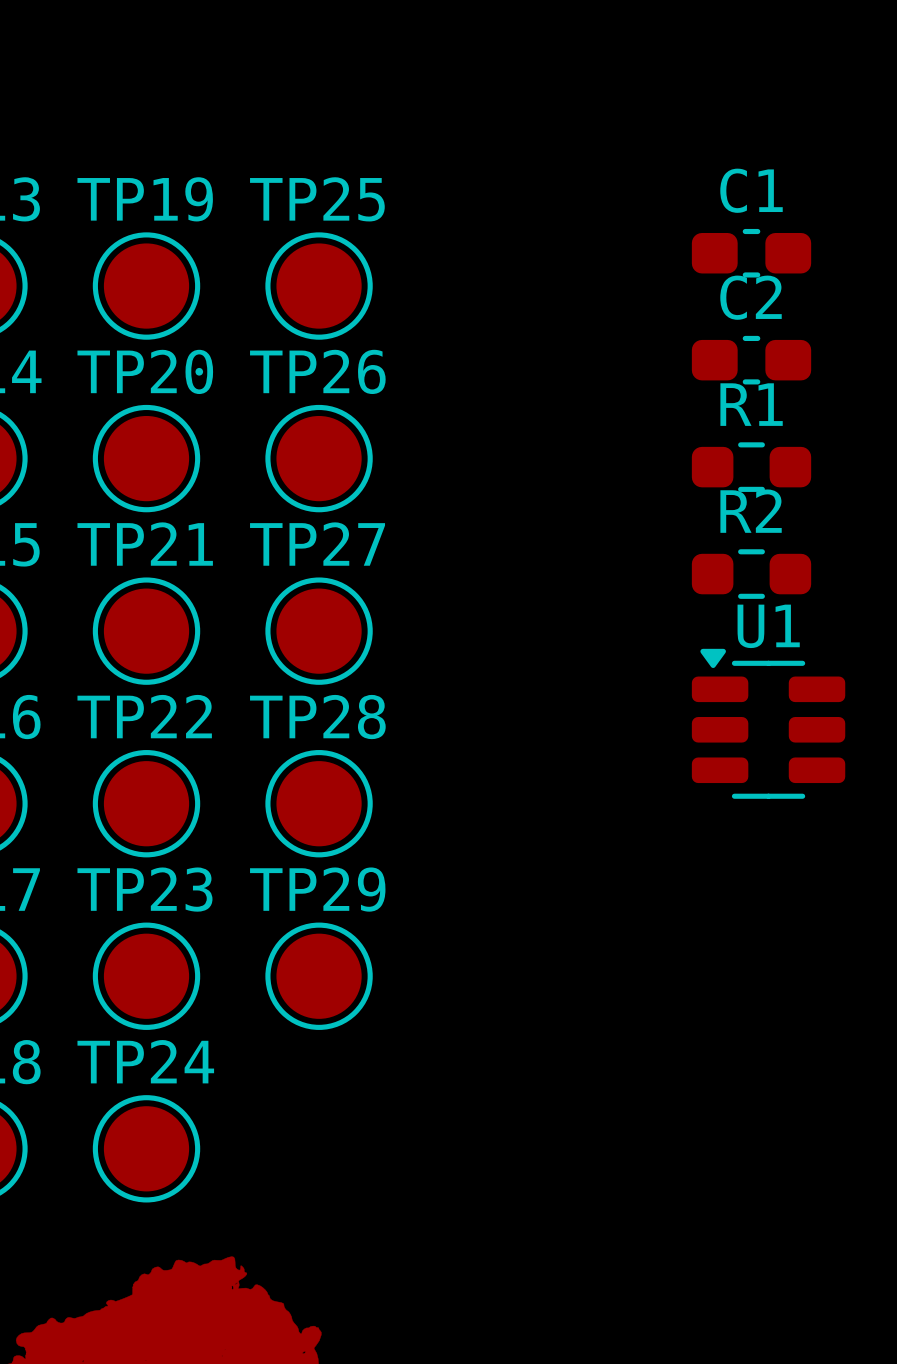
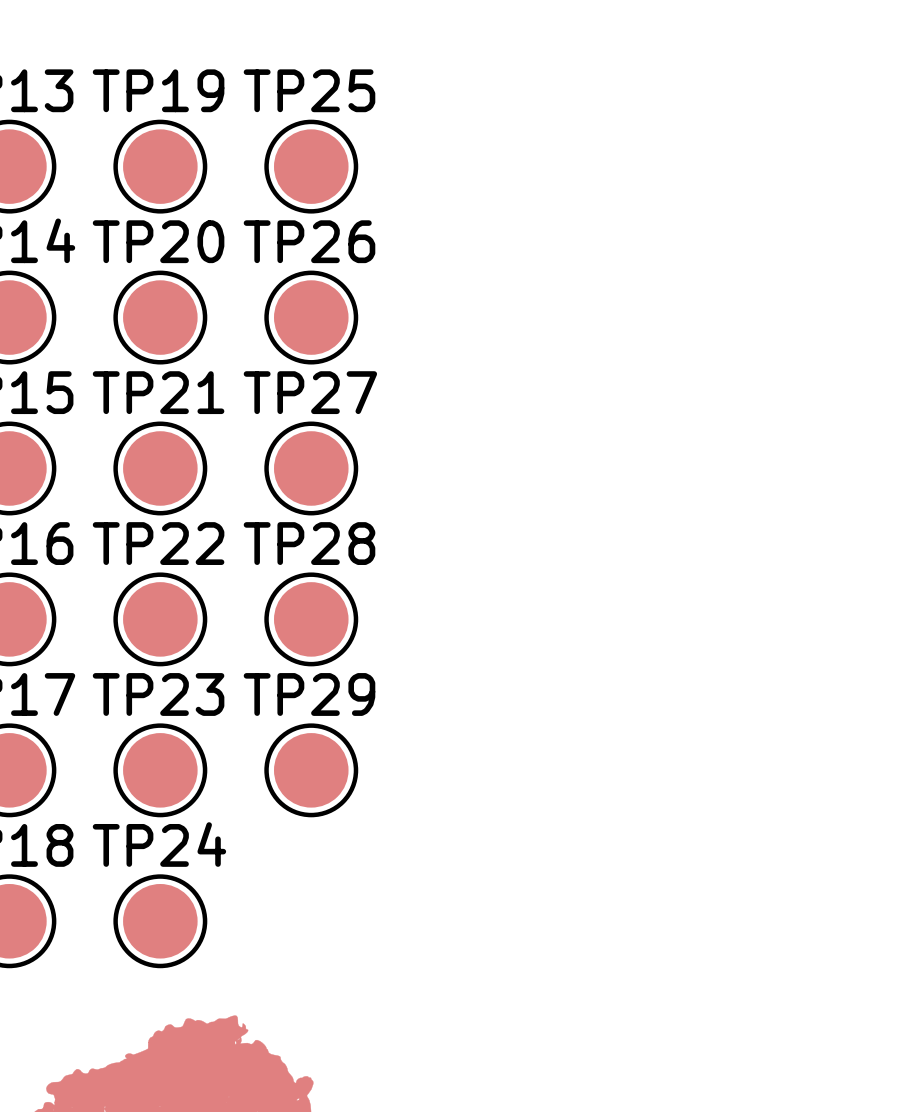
C1: (751, 253) -> none
C2: (751, 360) -> none
R1: (751, 467) -> none
R2: (751, 574) -> none
U1: (768, 723) -> none

